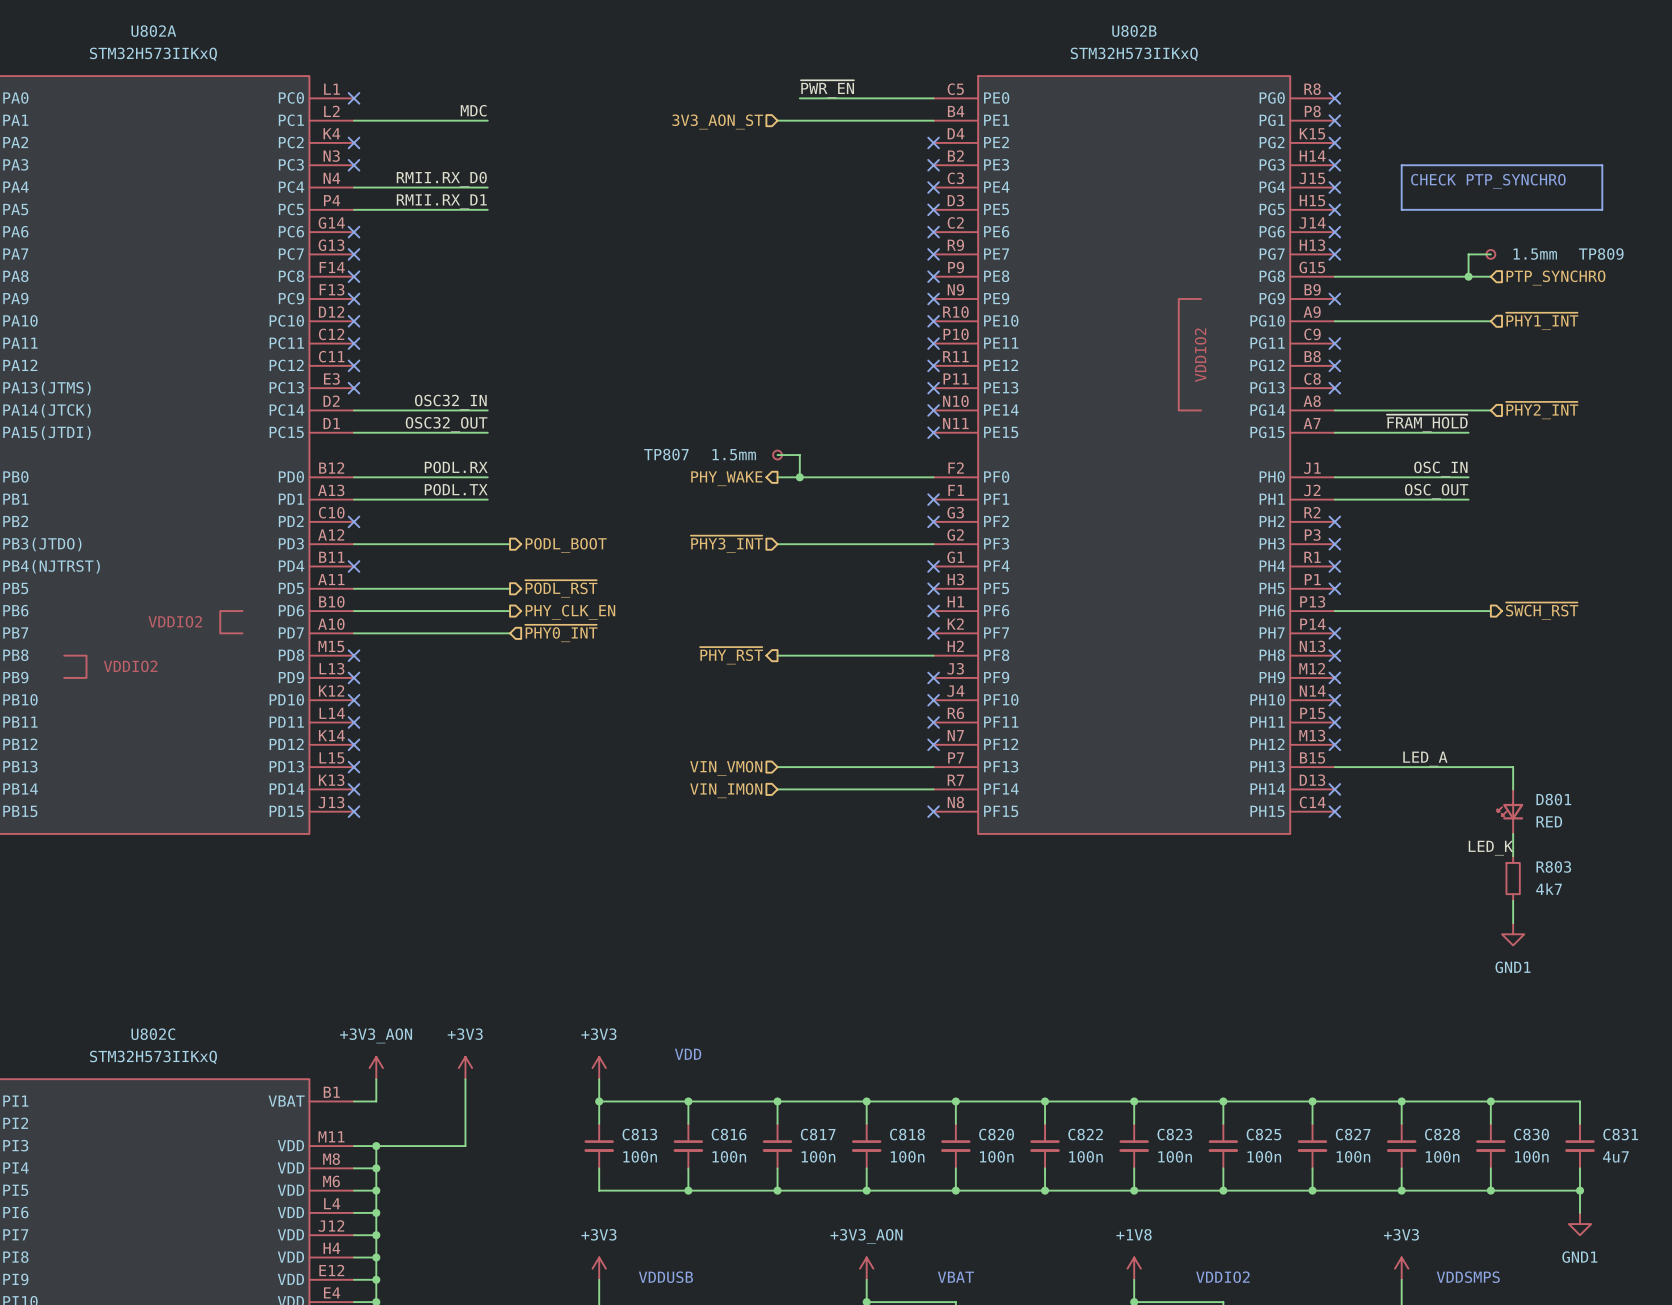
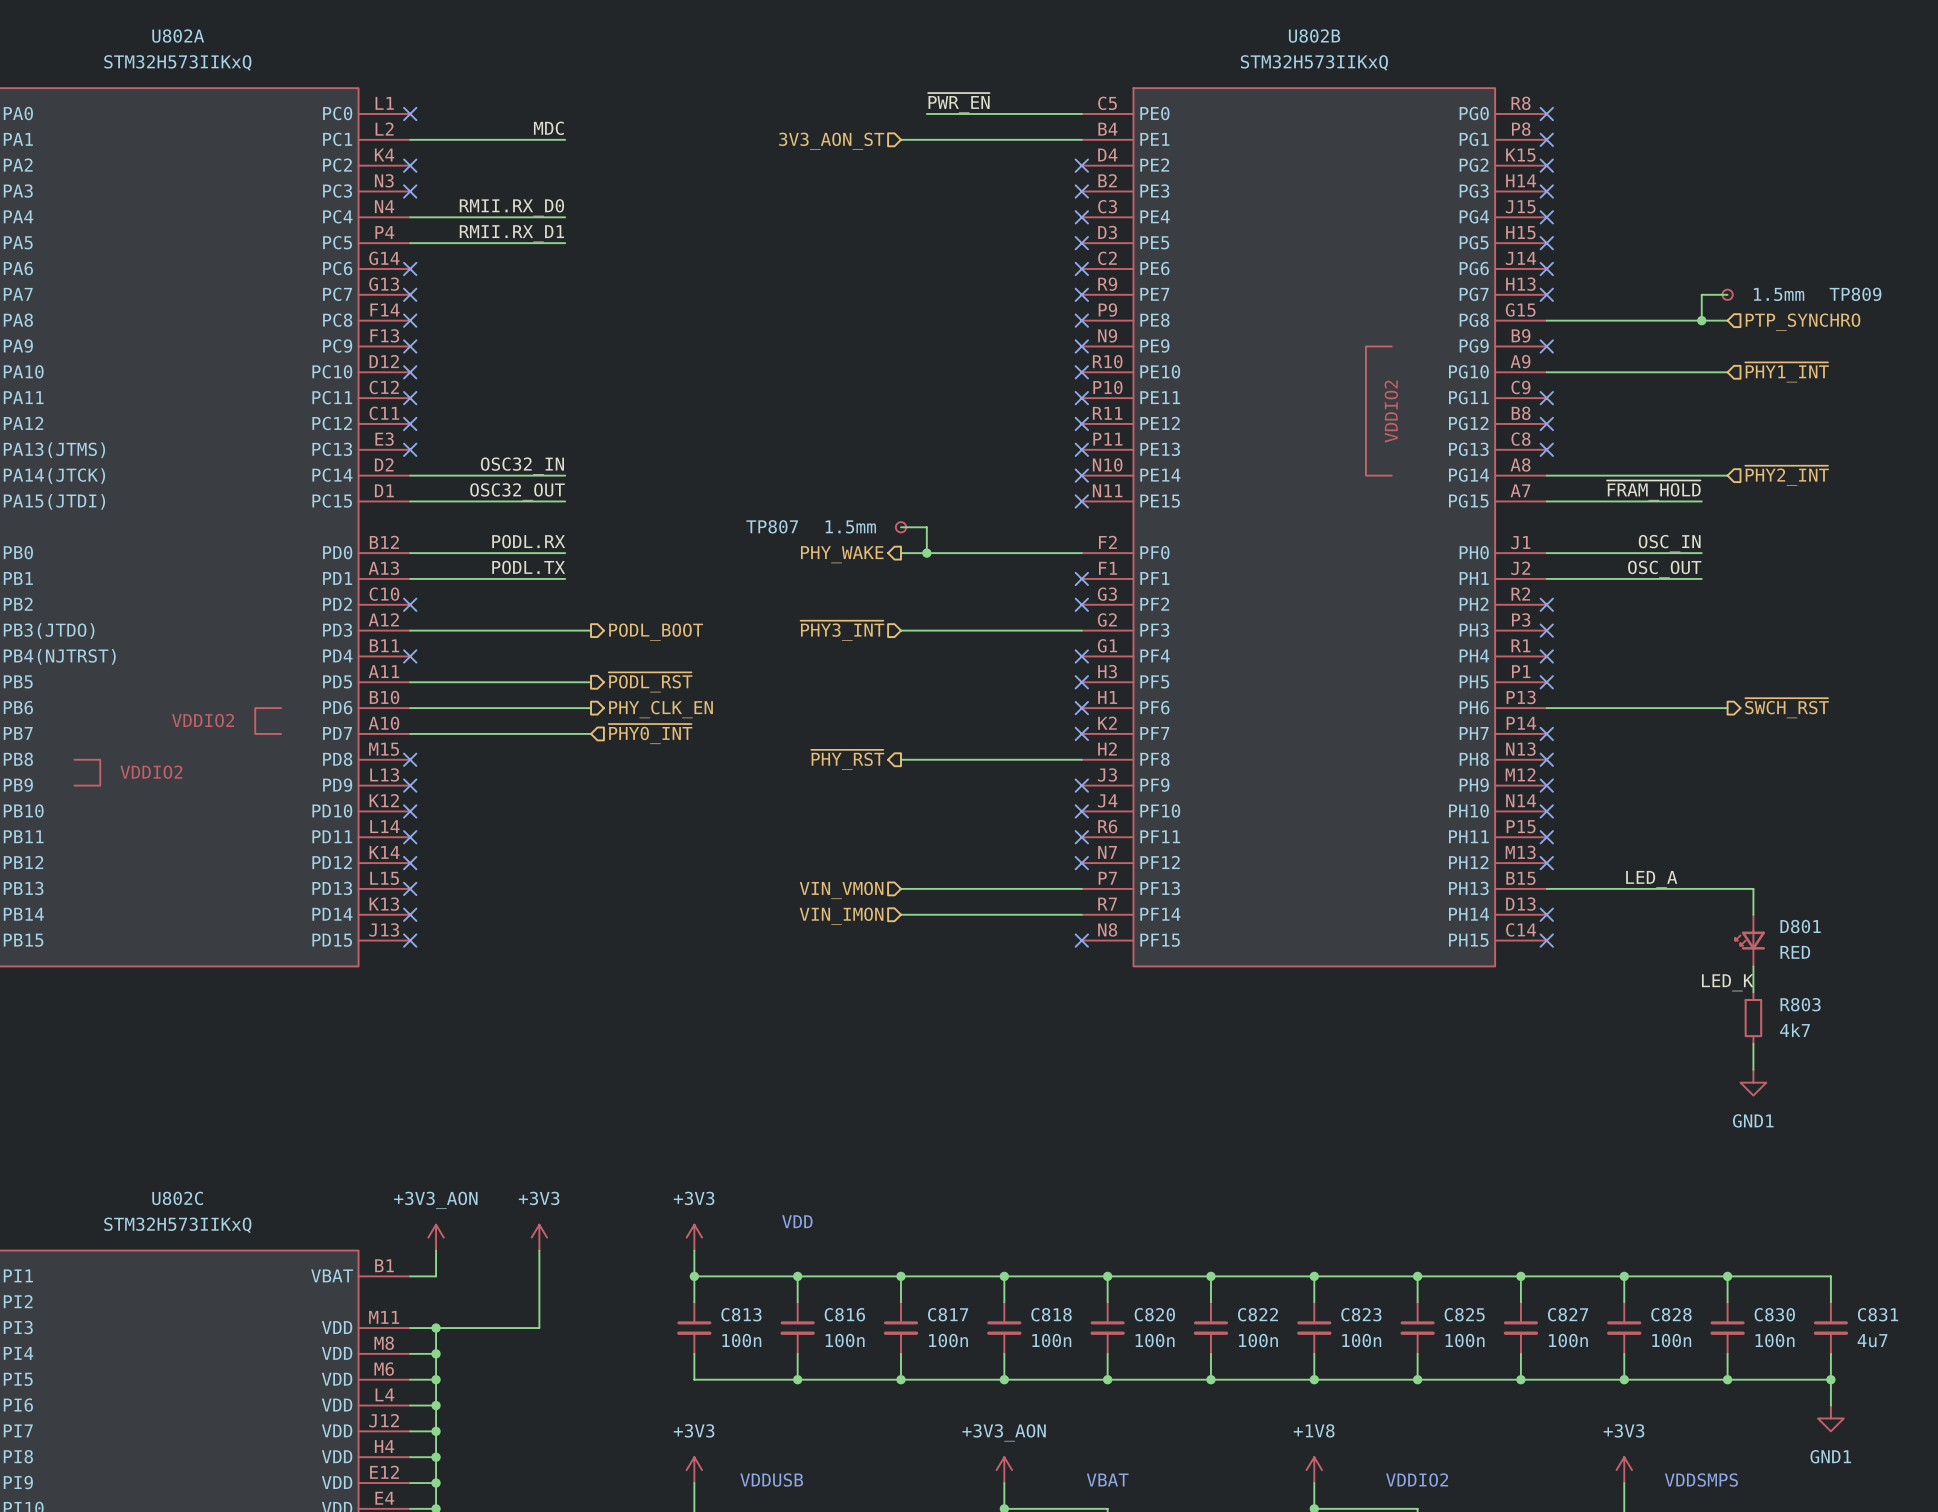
line: (1401, 165) (1602, 165) (1602, 209) (1401, 209) (1401, 165) -> none
text: CHECK PTP_SYNCHRO (1488, 181) -> none

